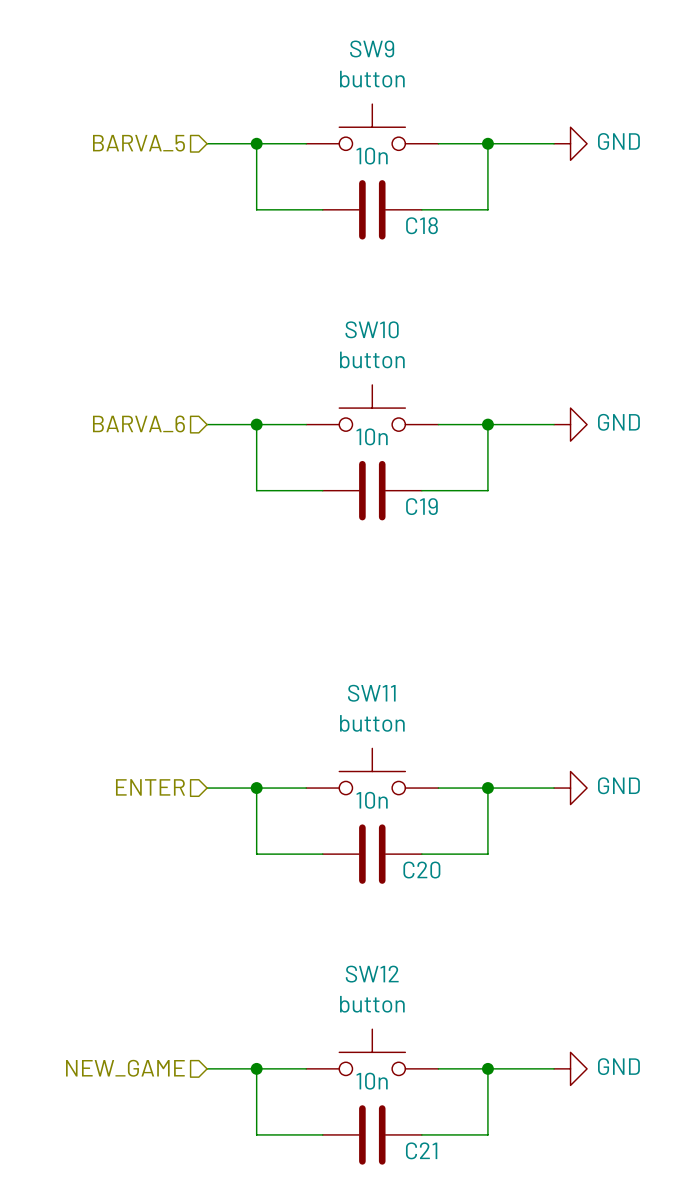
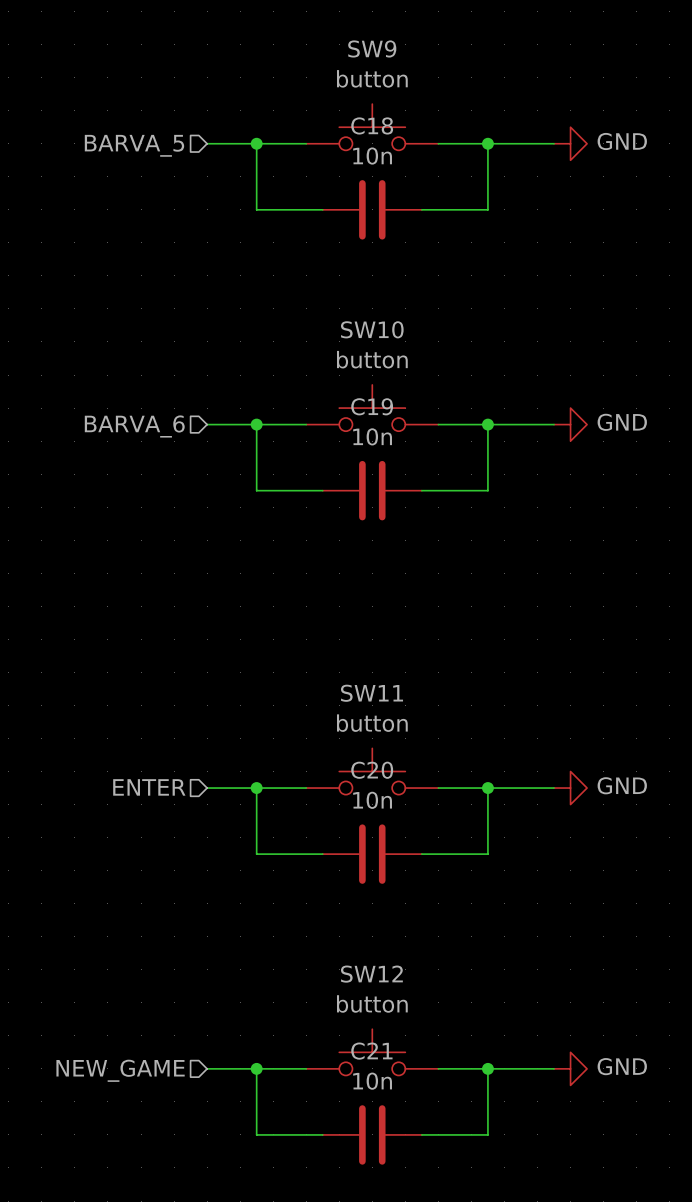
C18 name position: C18 (421, 225) -> C18 (372, 125)
C19 name position: C19 (421, 506) -> C19 (372, 406)
C20 name position: C20 (421, 870) -> C20 (372, 770)
C21 name position: C21 (421, 1150) -> C21 (371, 1051)

